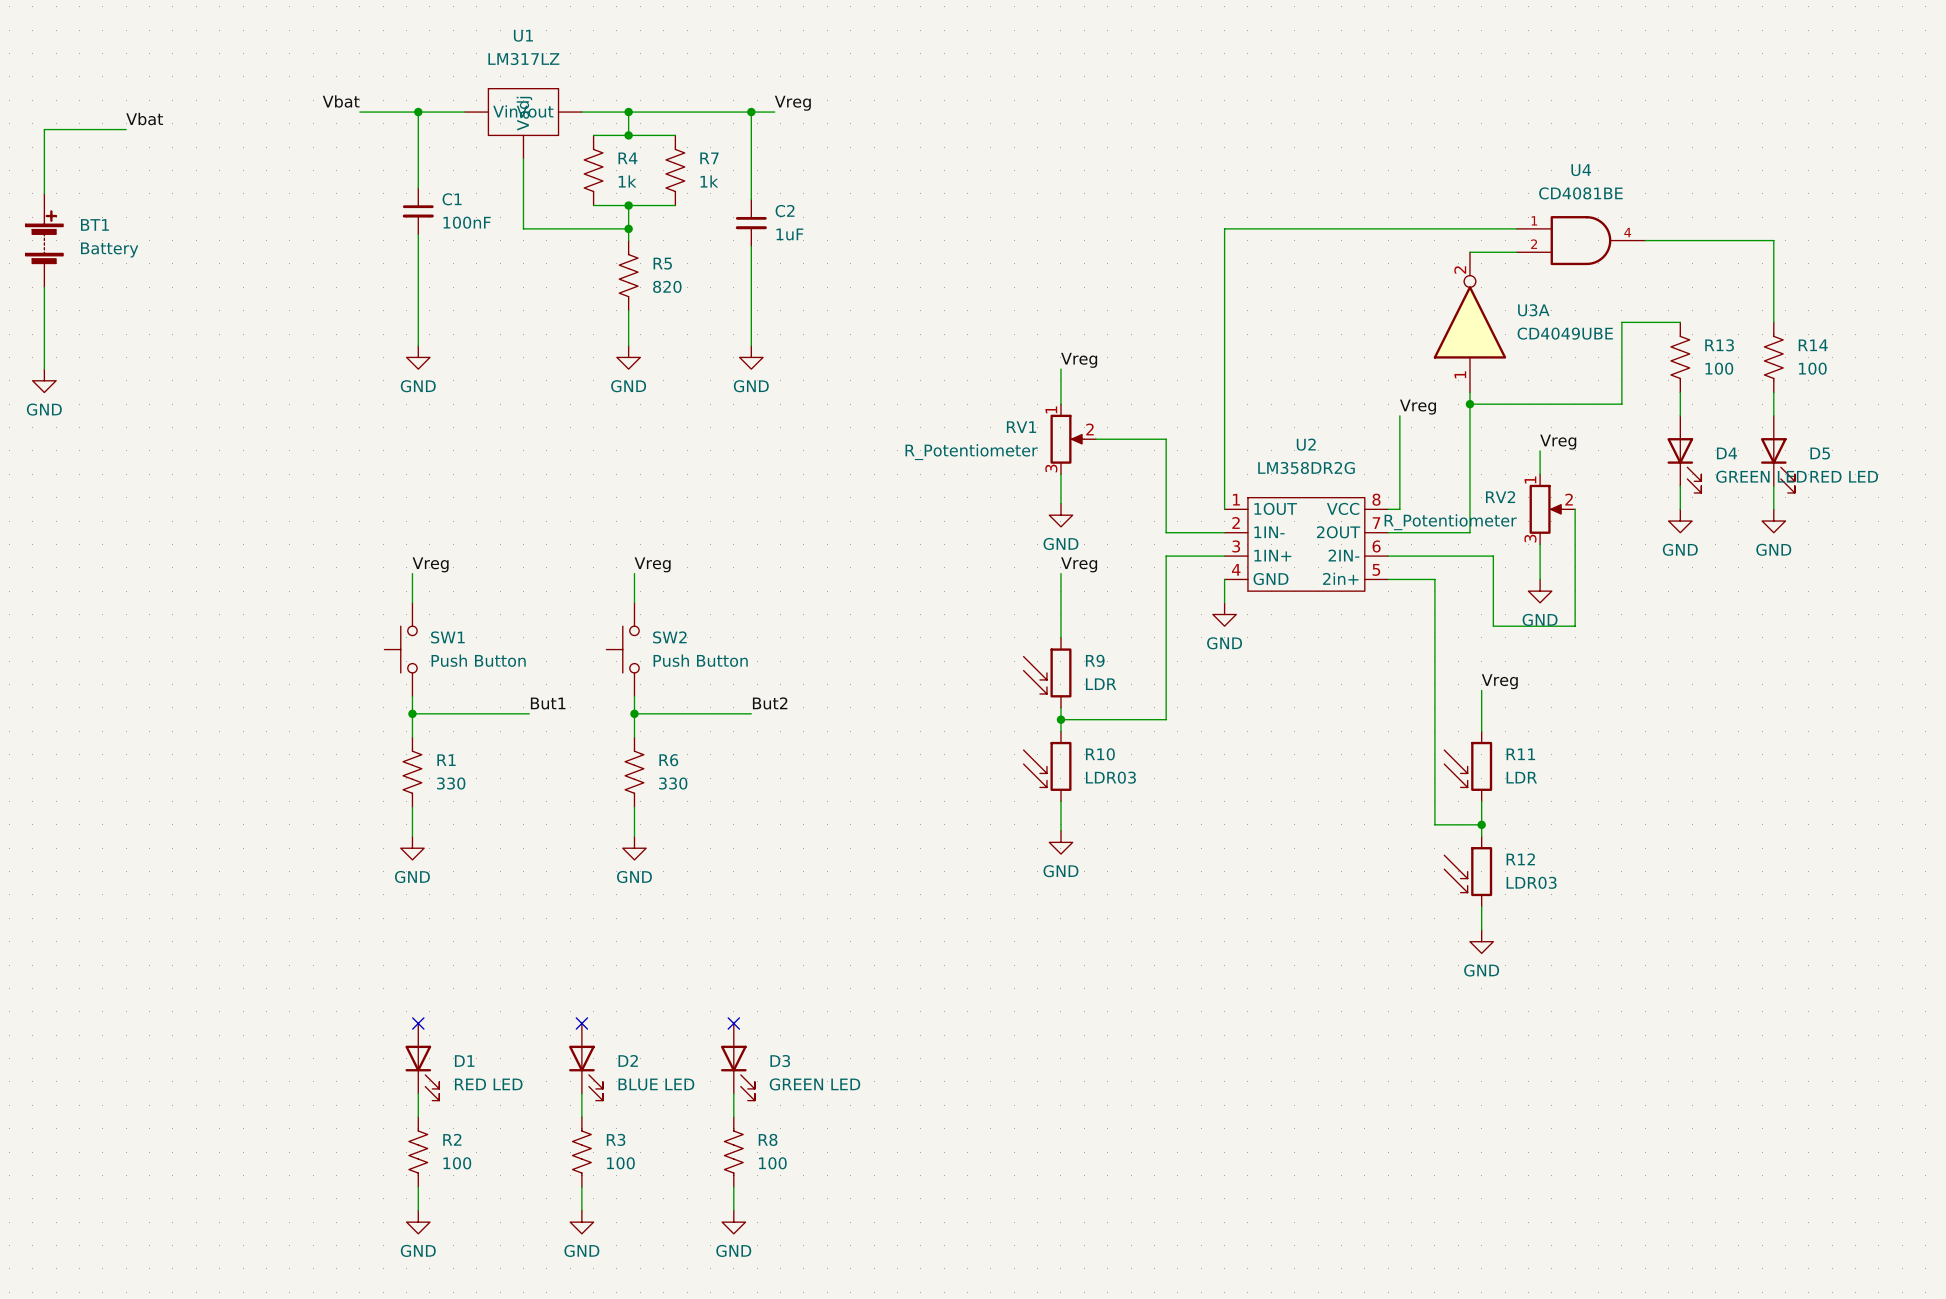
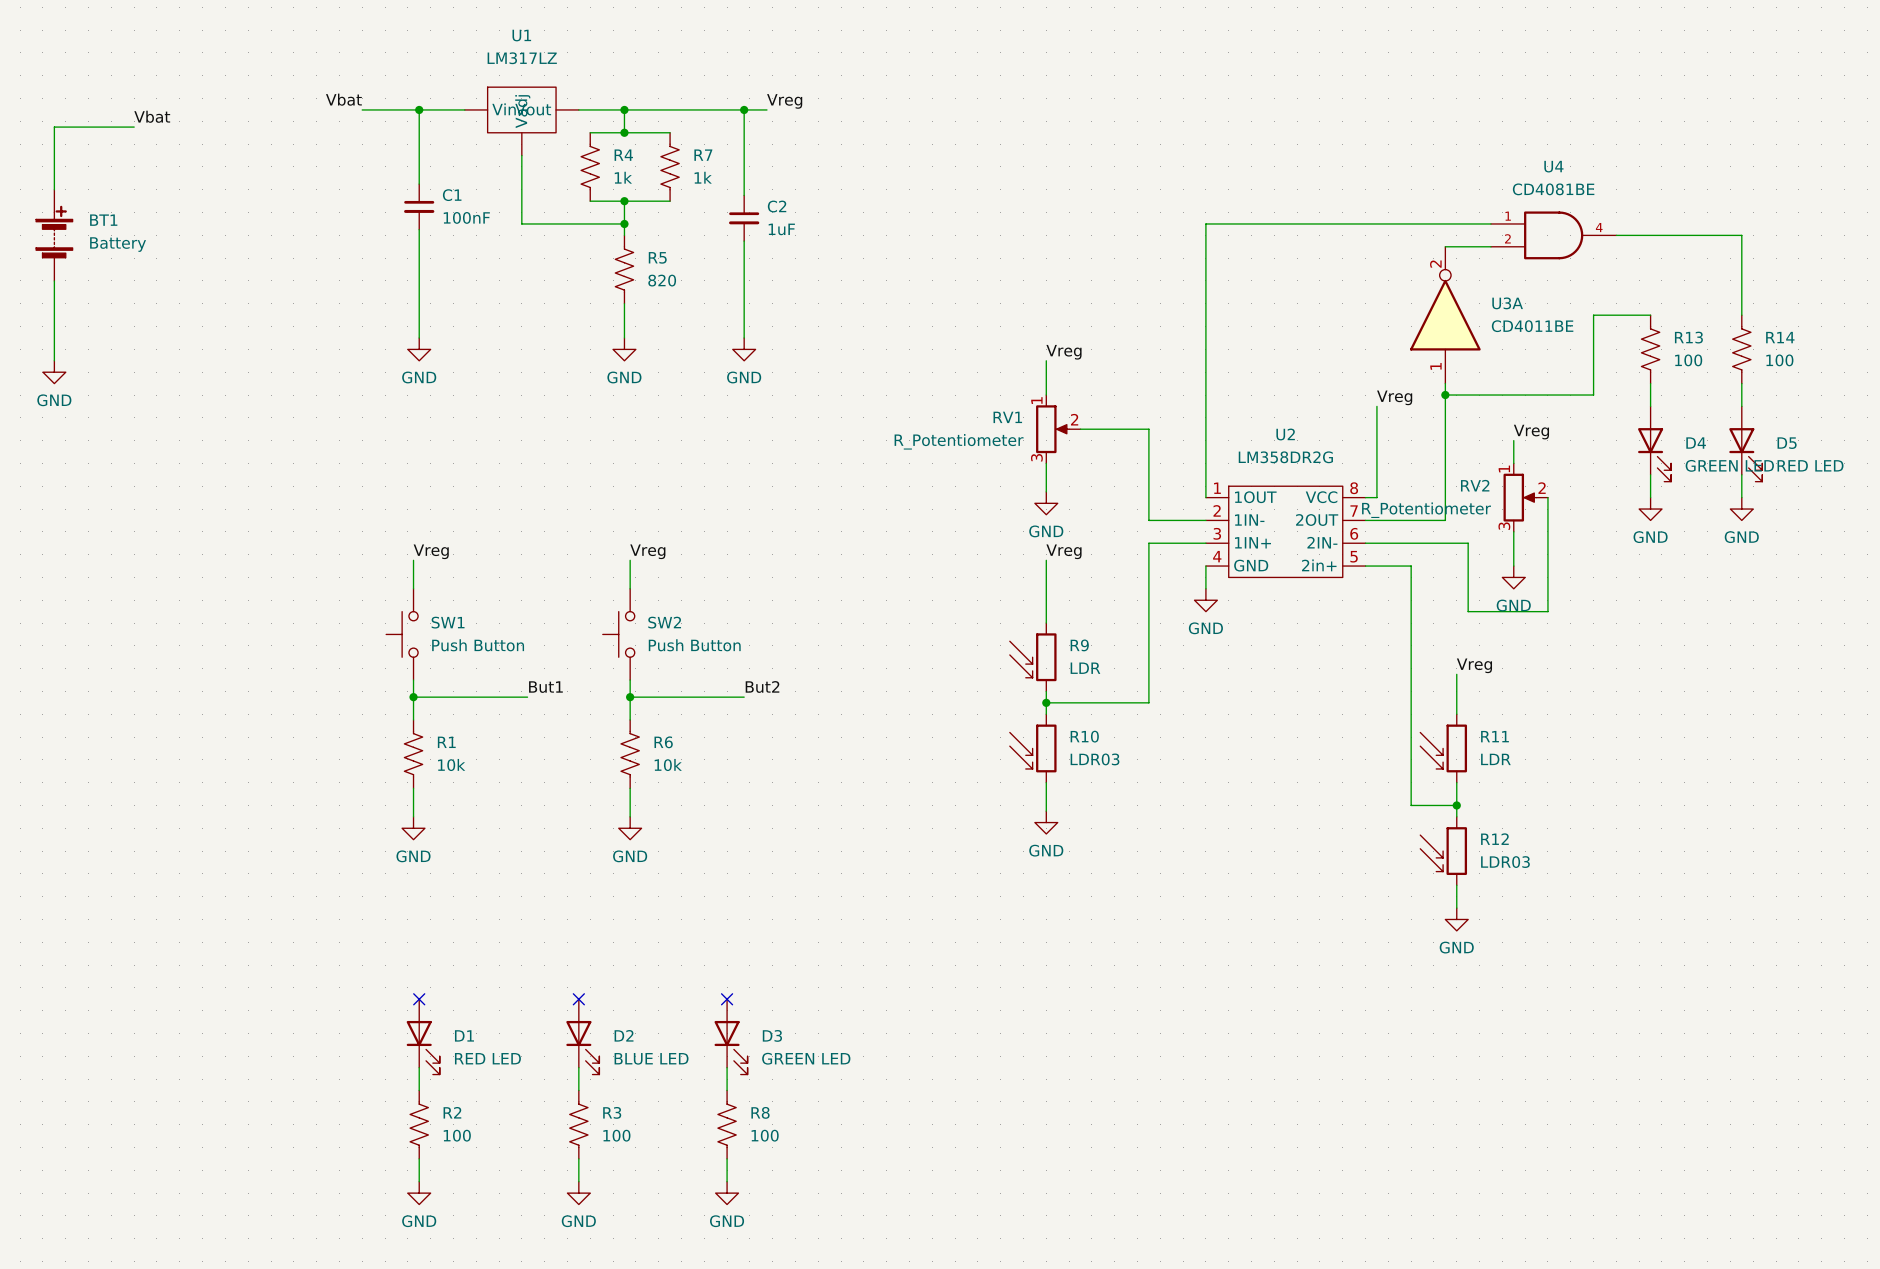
U3A value: CD4049UBE (1565, 333) -> CD4011BE (1532, 326)
R1 value: 330 (451, 783) -> 10k (451, 765)
R6 value: 330 (673, 783) -> 10k (668, 765)

